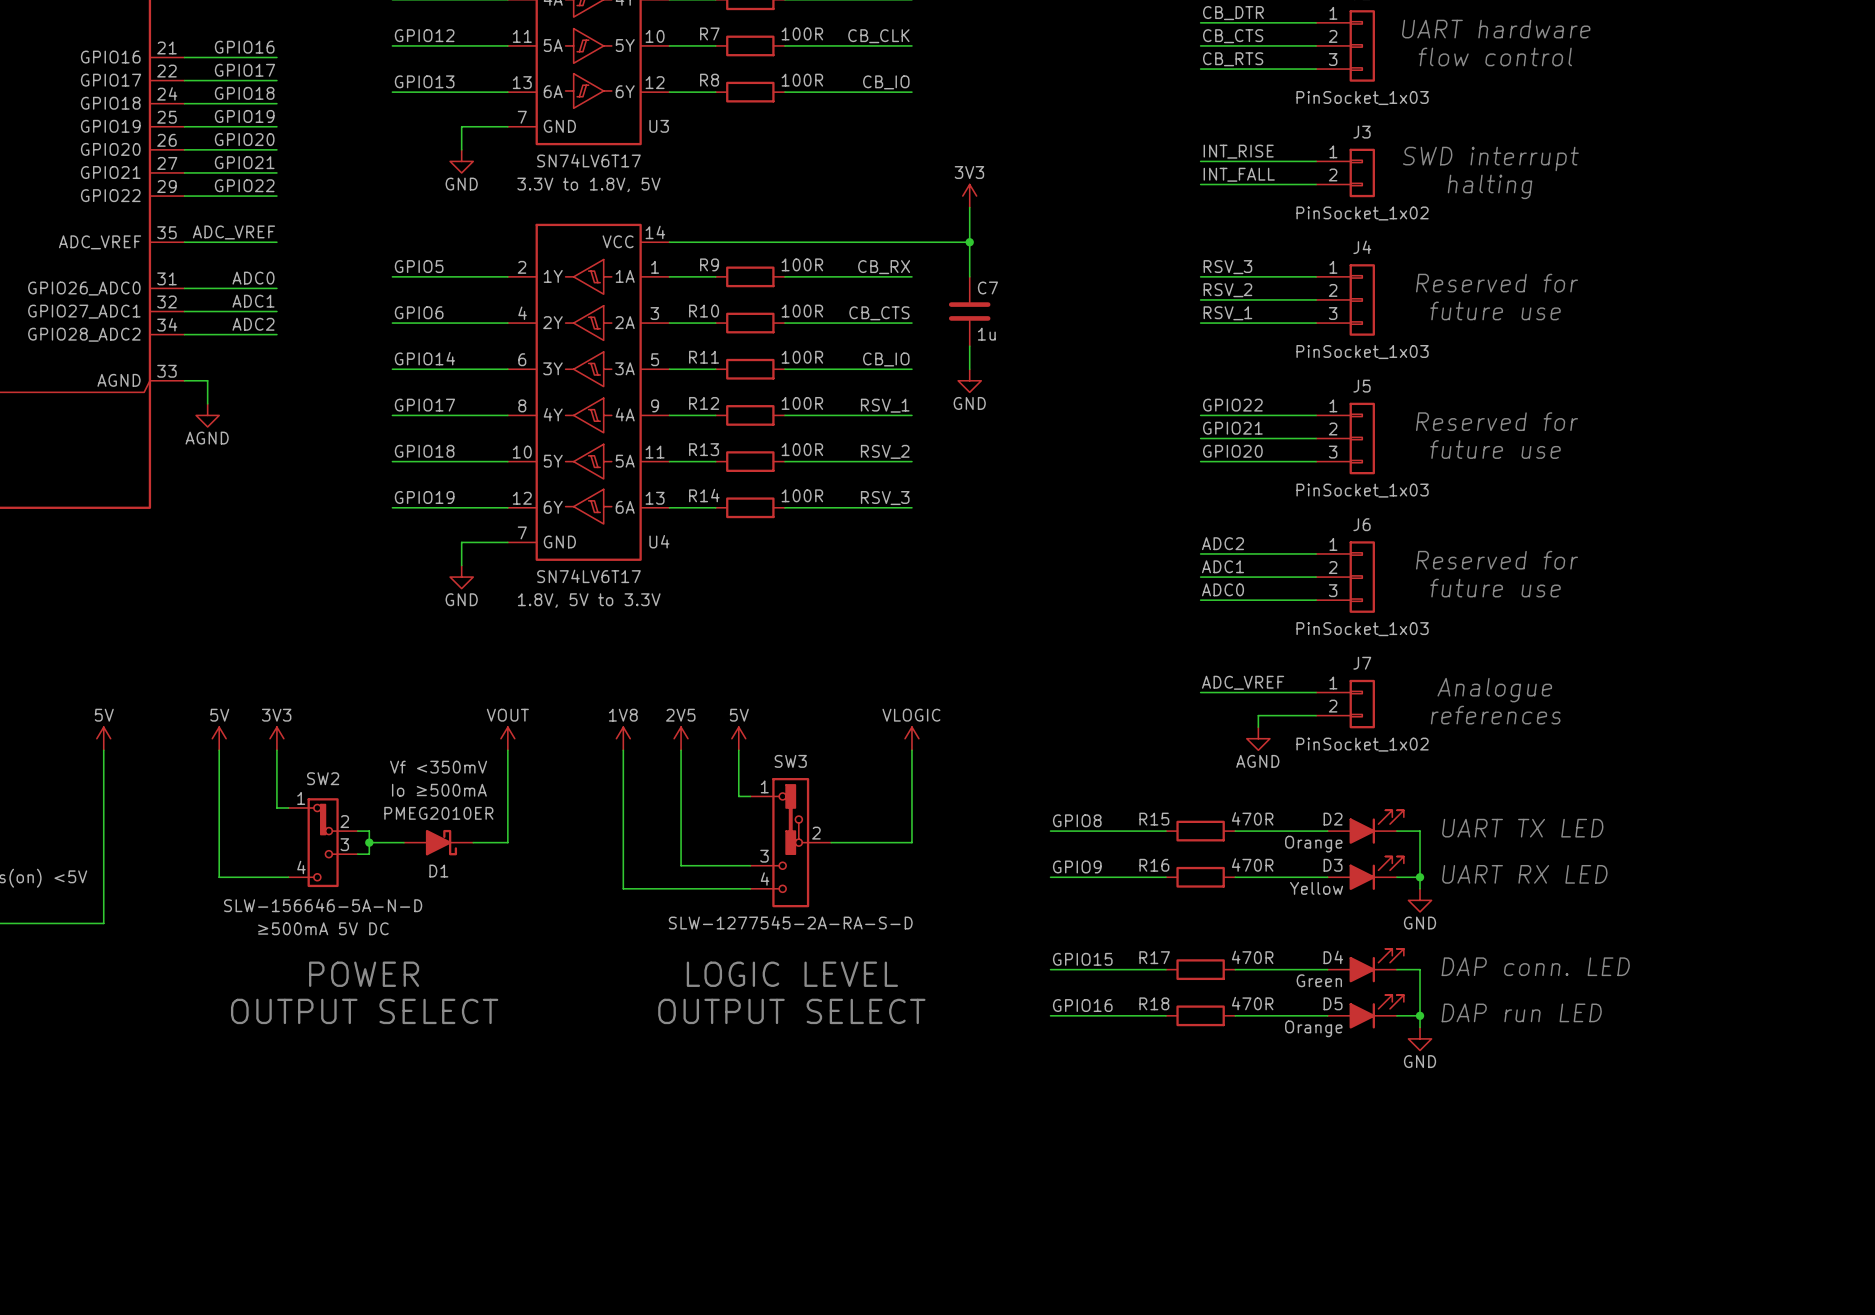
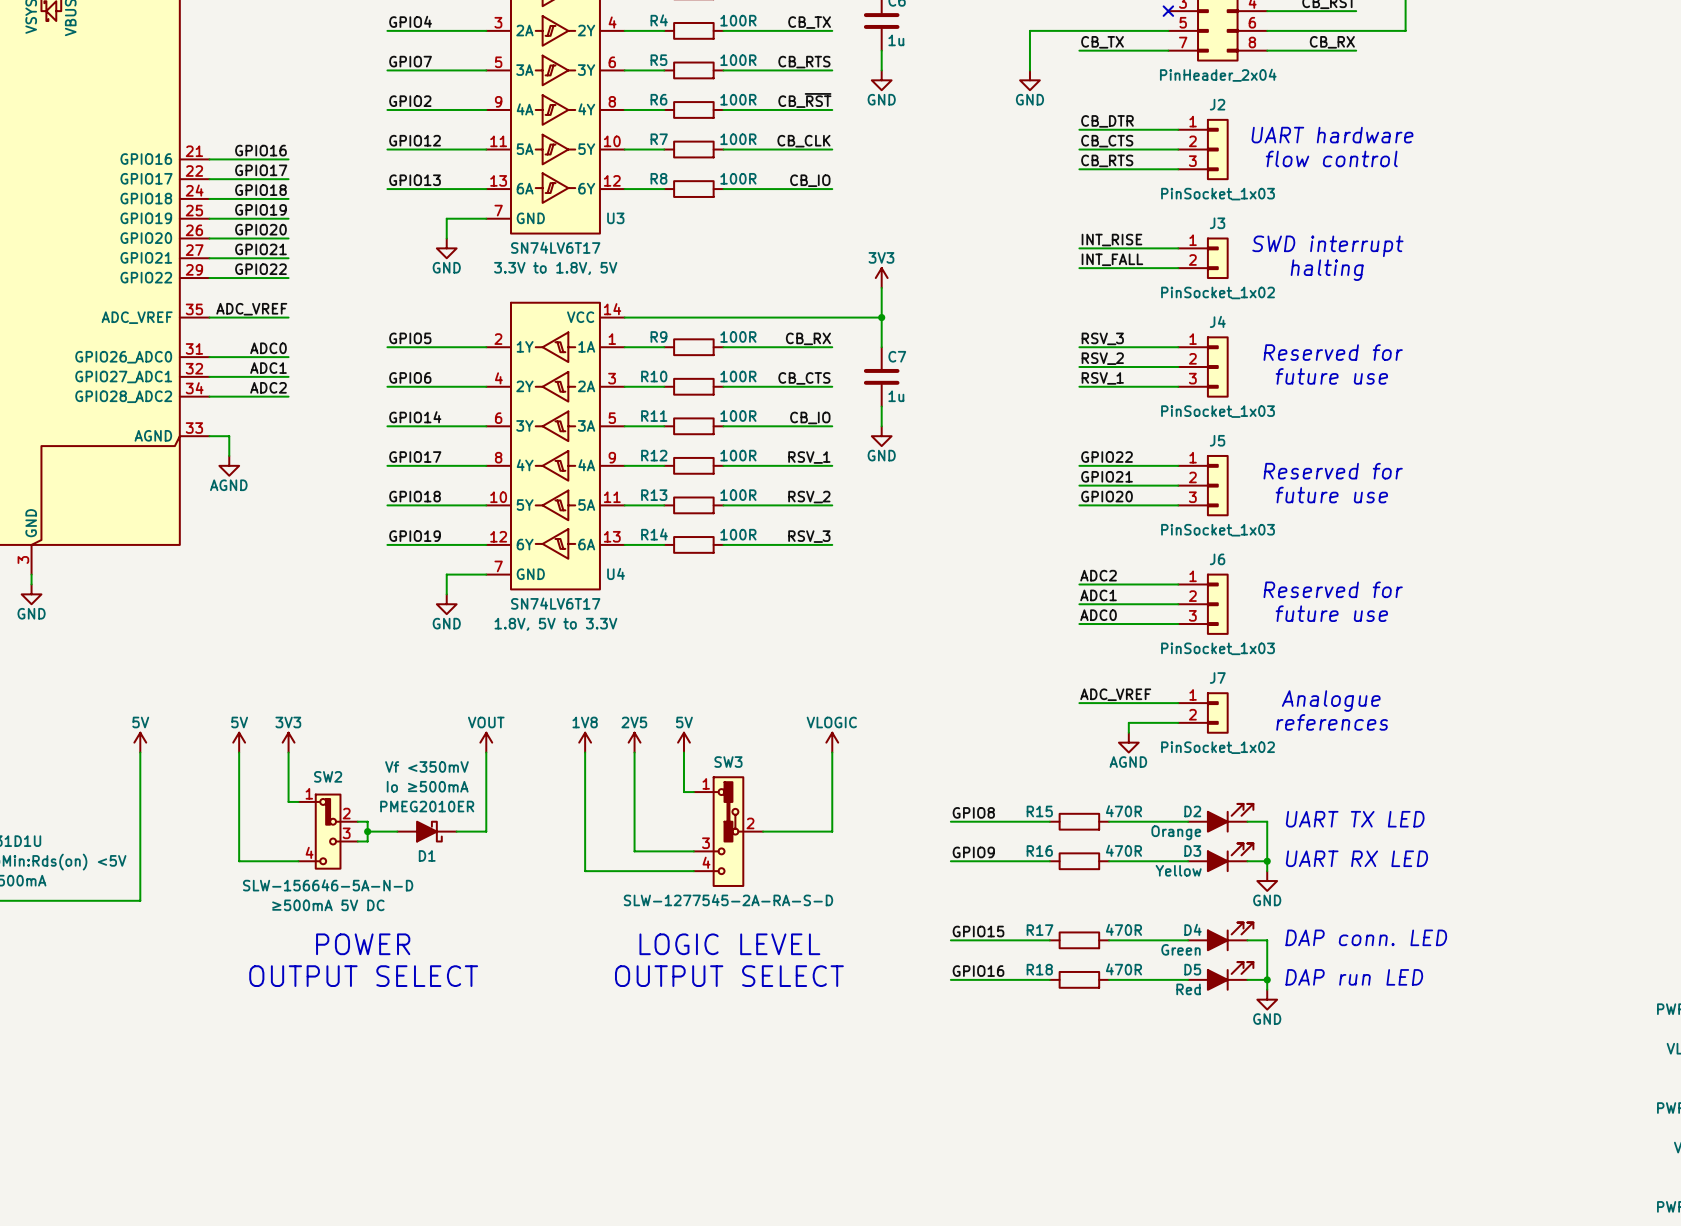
D5 value: Orange (1313, 1028) -> Red (1188, 989)

